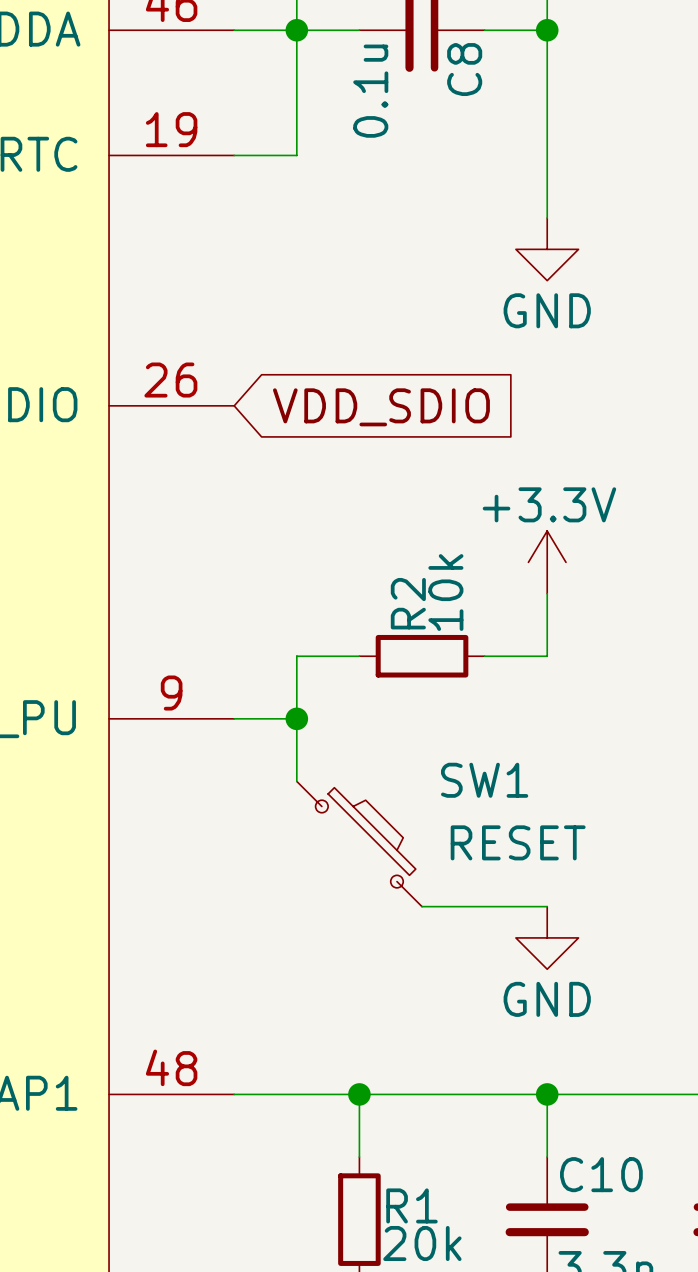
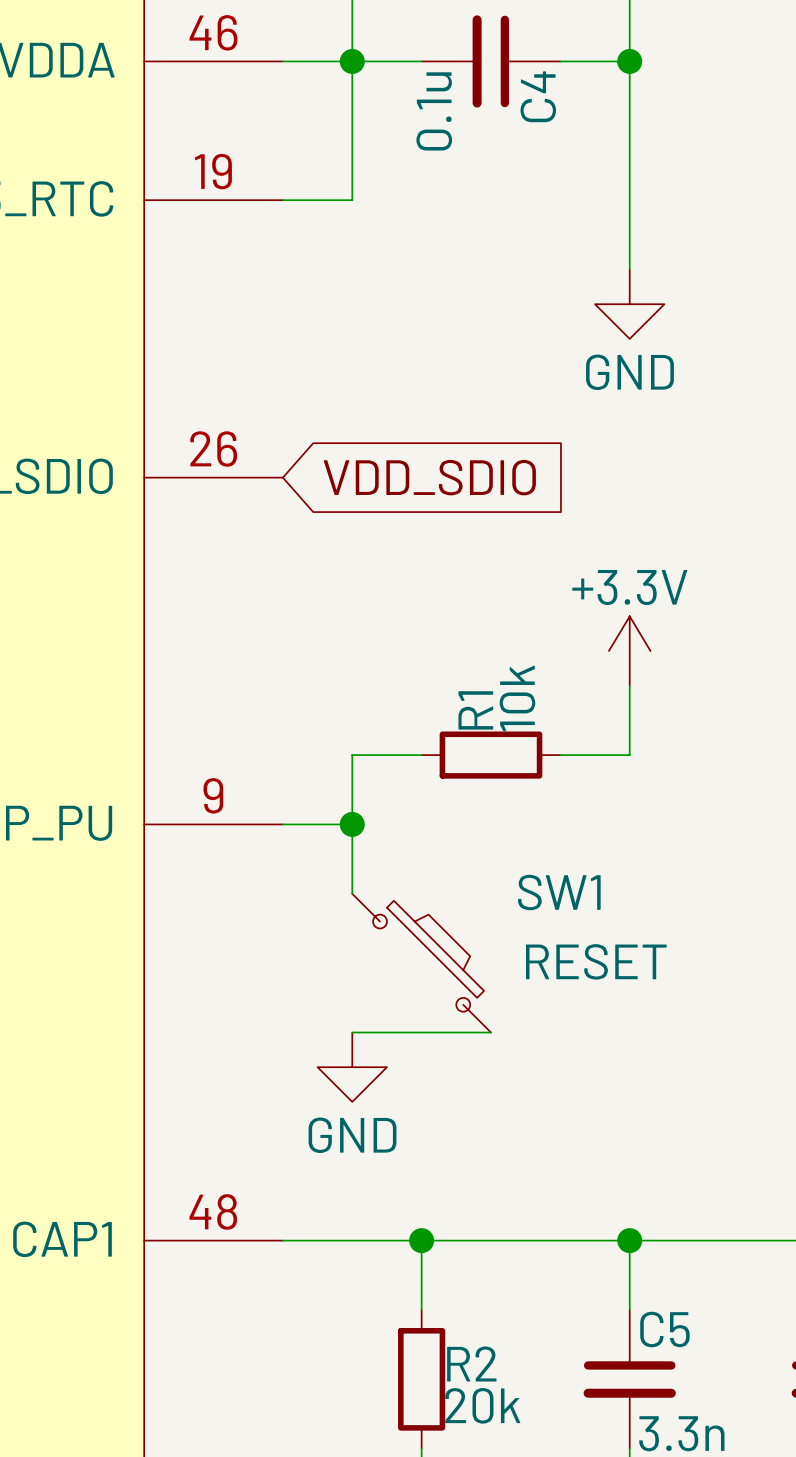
C8 name: C8 (464, 69) -> C4 (538, 96)
R2 name: R2 (408, 603) -> R1 (475, 710)
wire: (422, 906) (547, 906) -> (490, 1032) (352, 1032)
power symbol position: GND (547, 937) -> GND (352, 1067)
C10 name: C10 (601, 1174) -> C5 (664, 1329)
R1 name: R1 (411, 1205) -> R2 (471, 1363)

